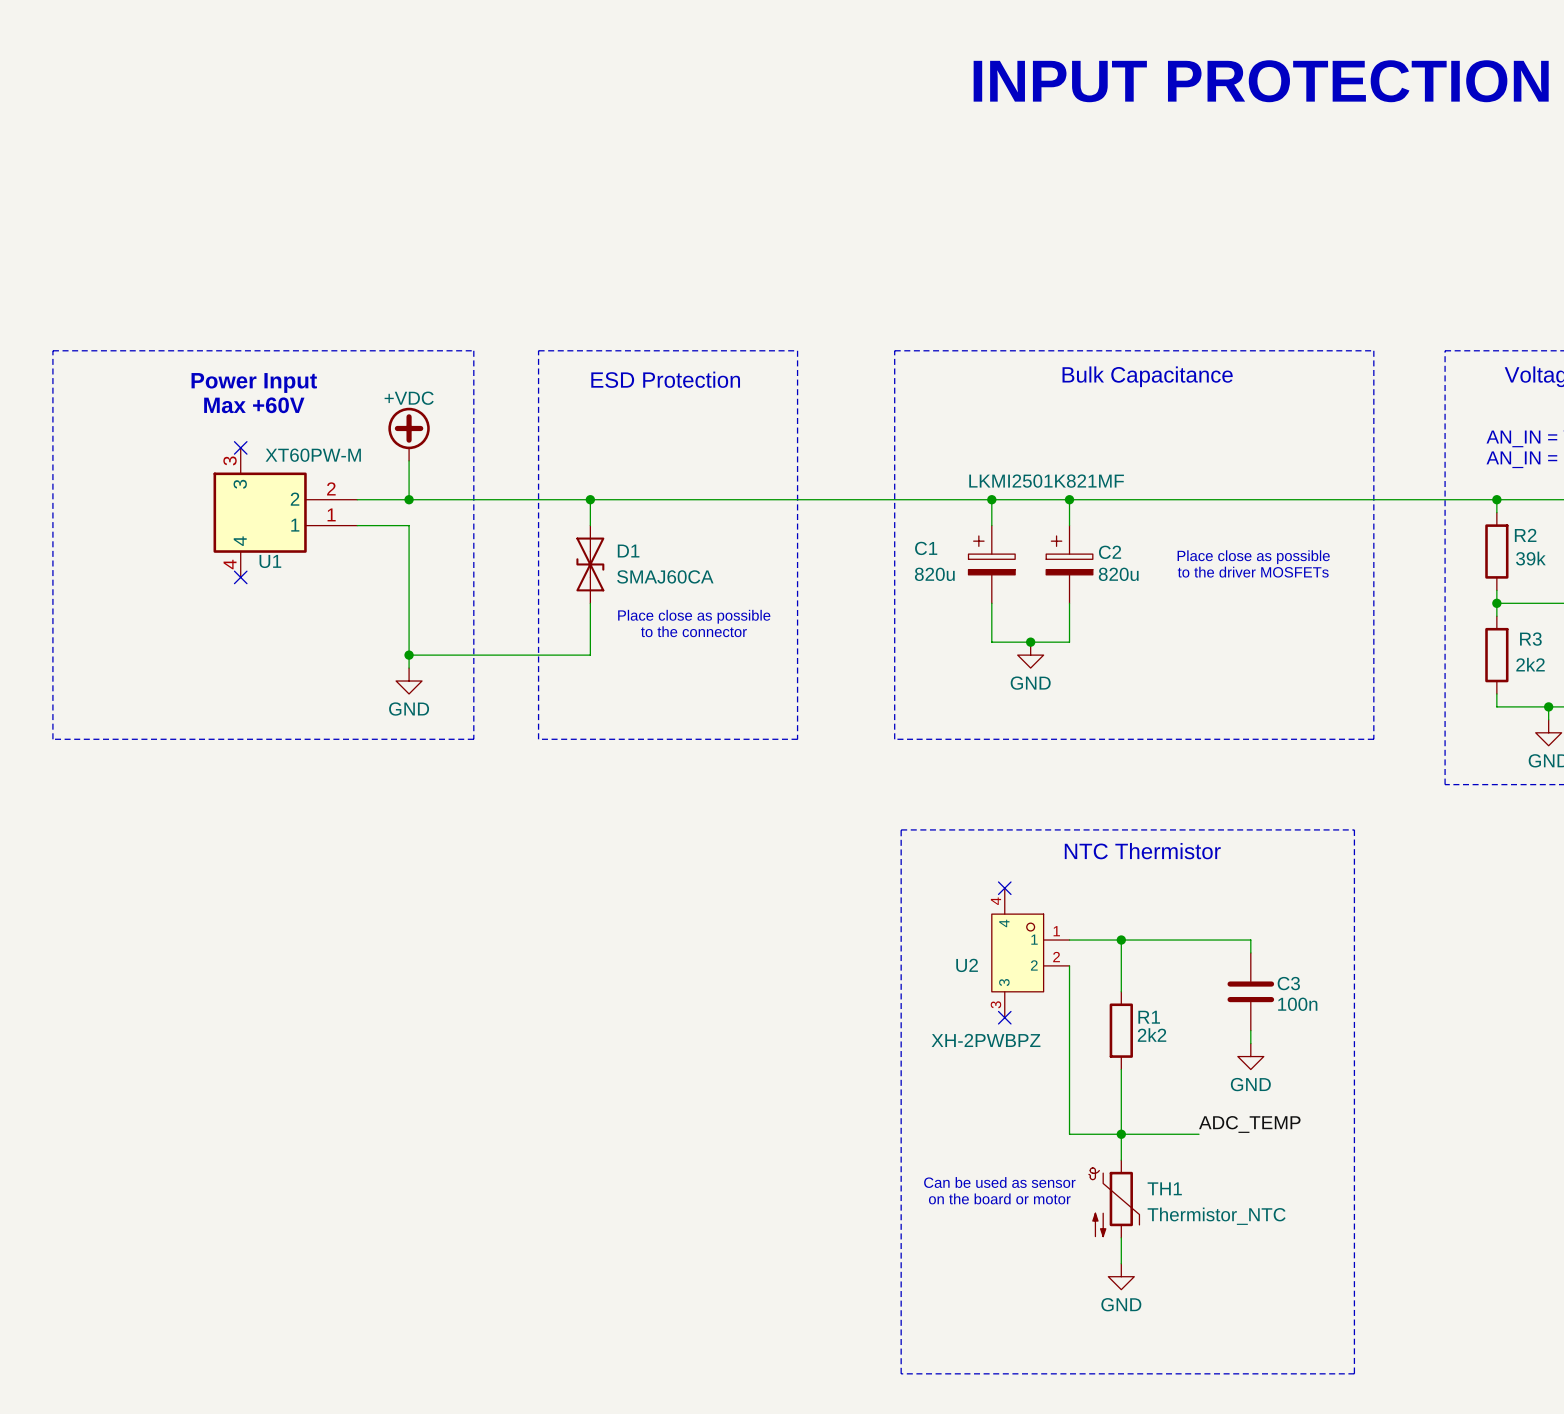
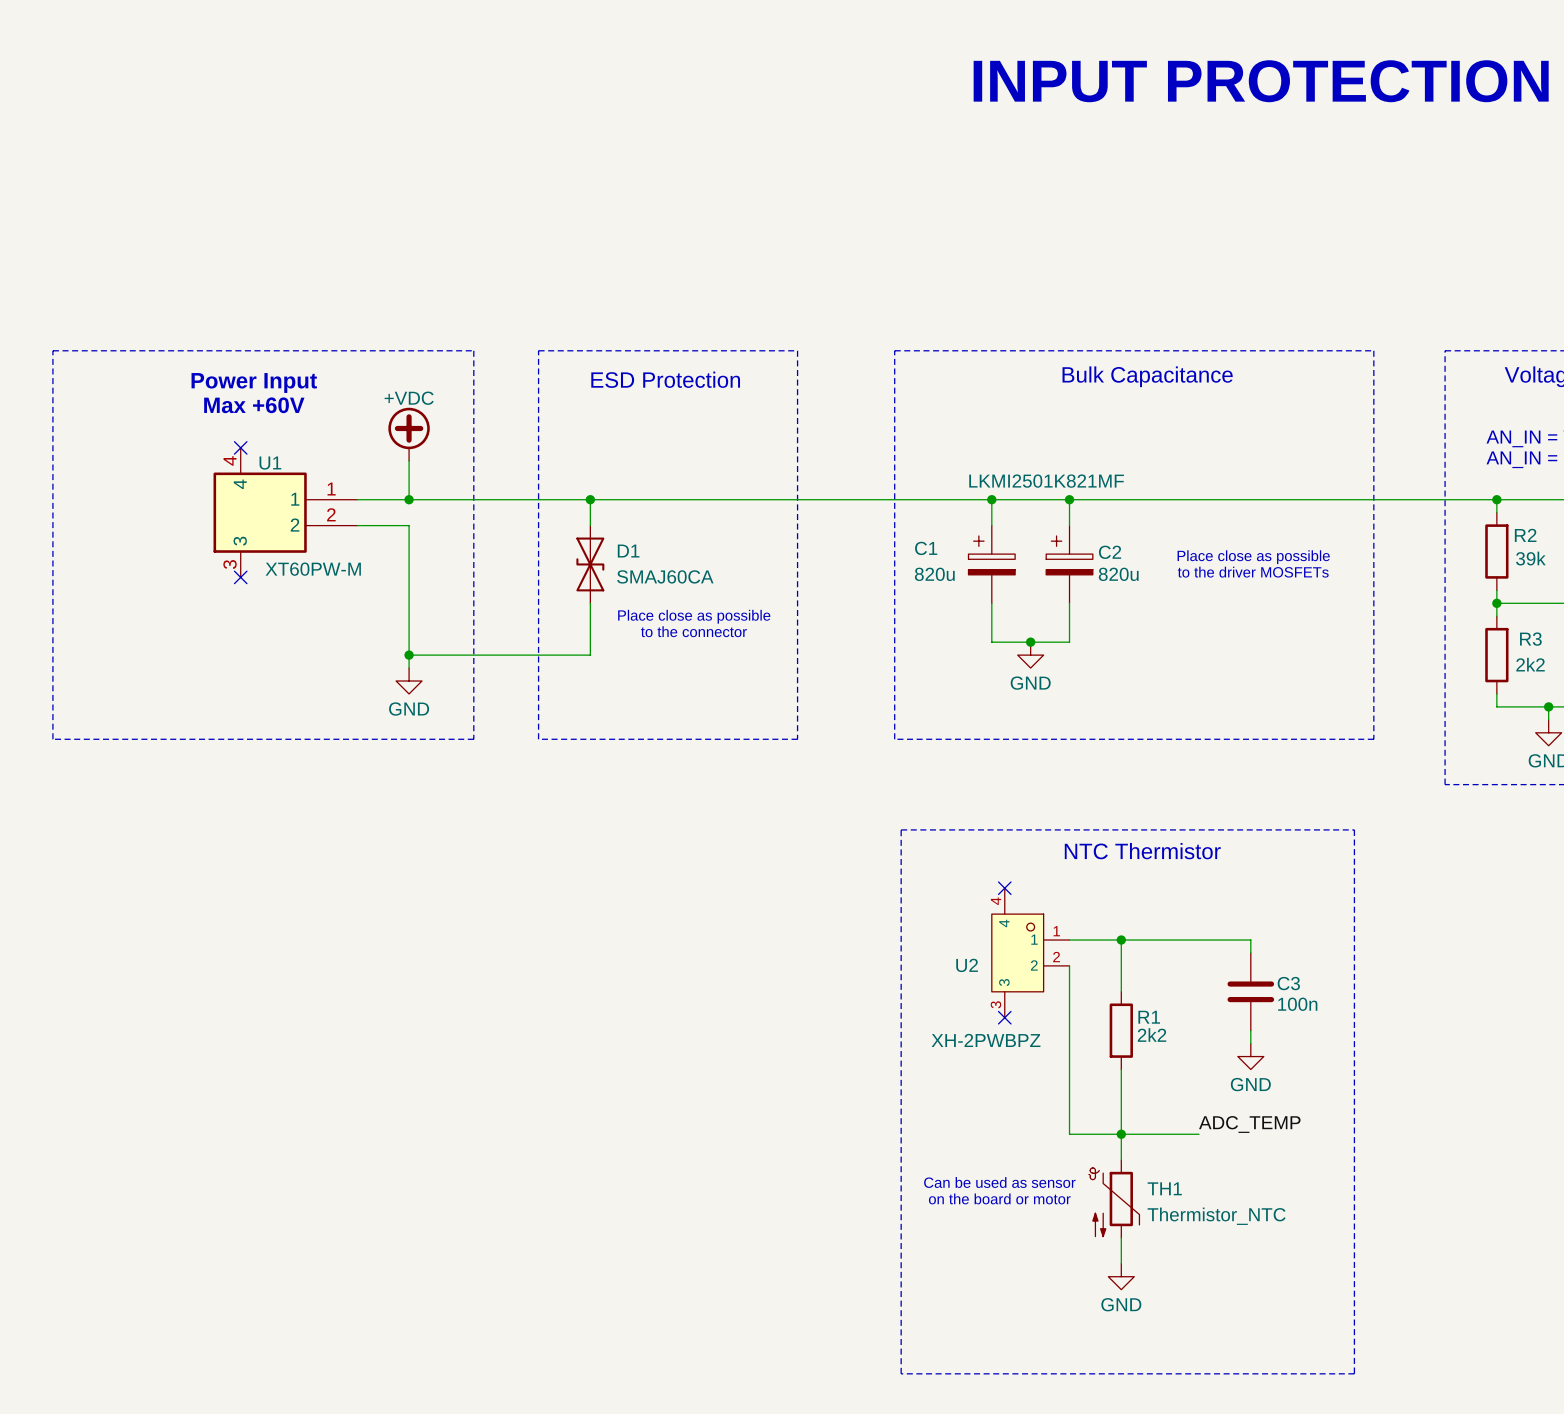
U1 flip: as is (260, 512) -> up-down (260, 512)

